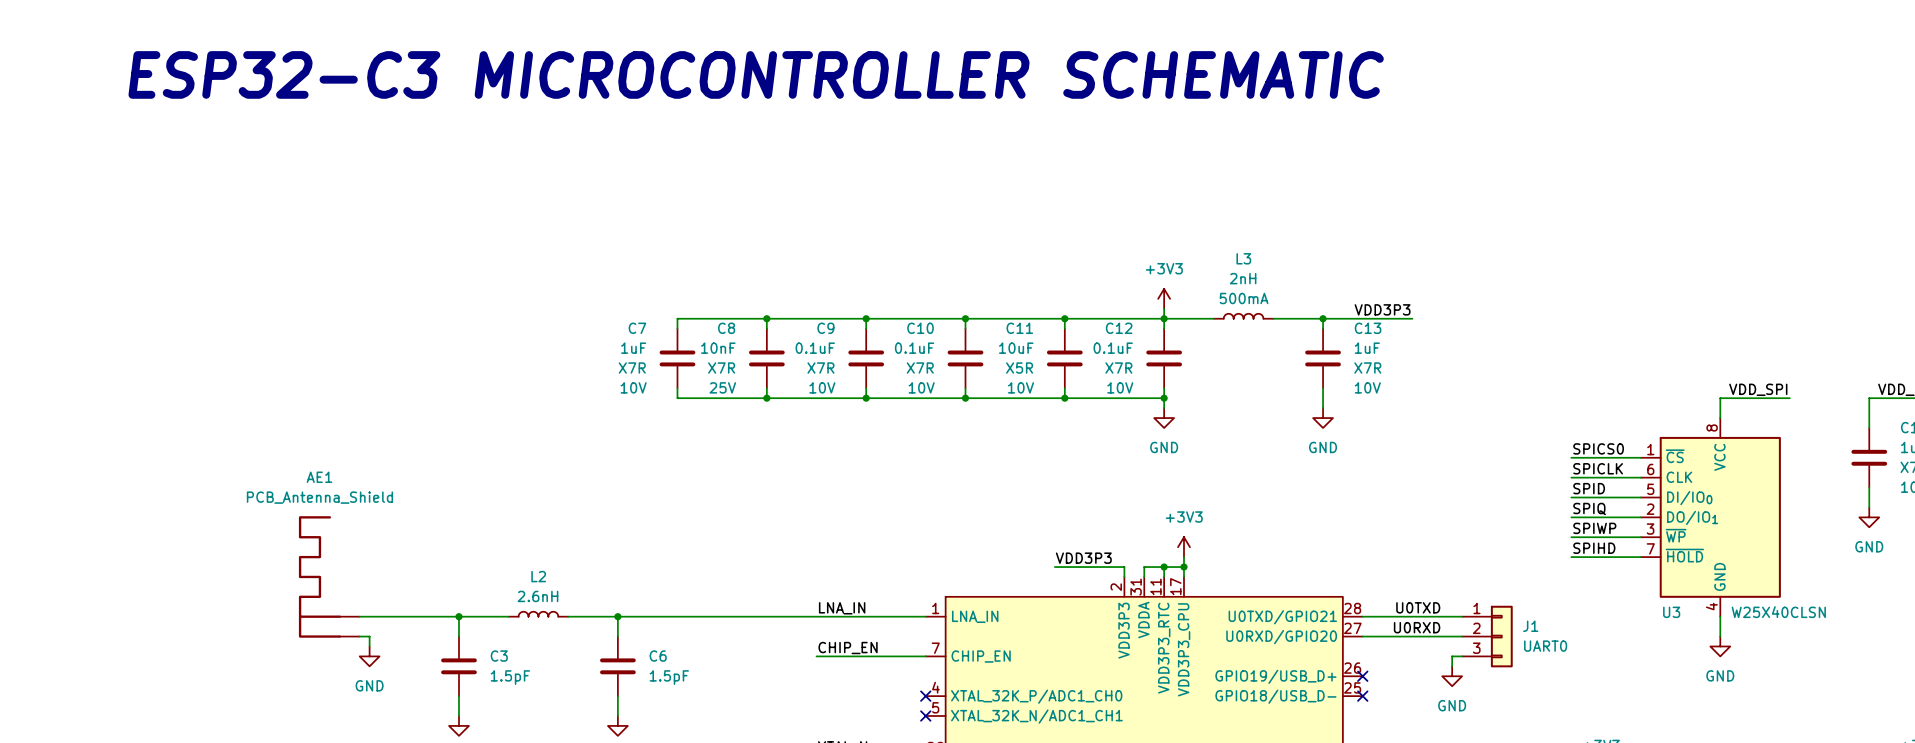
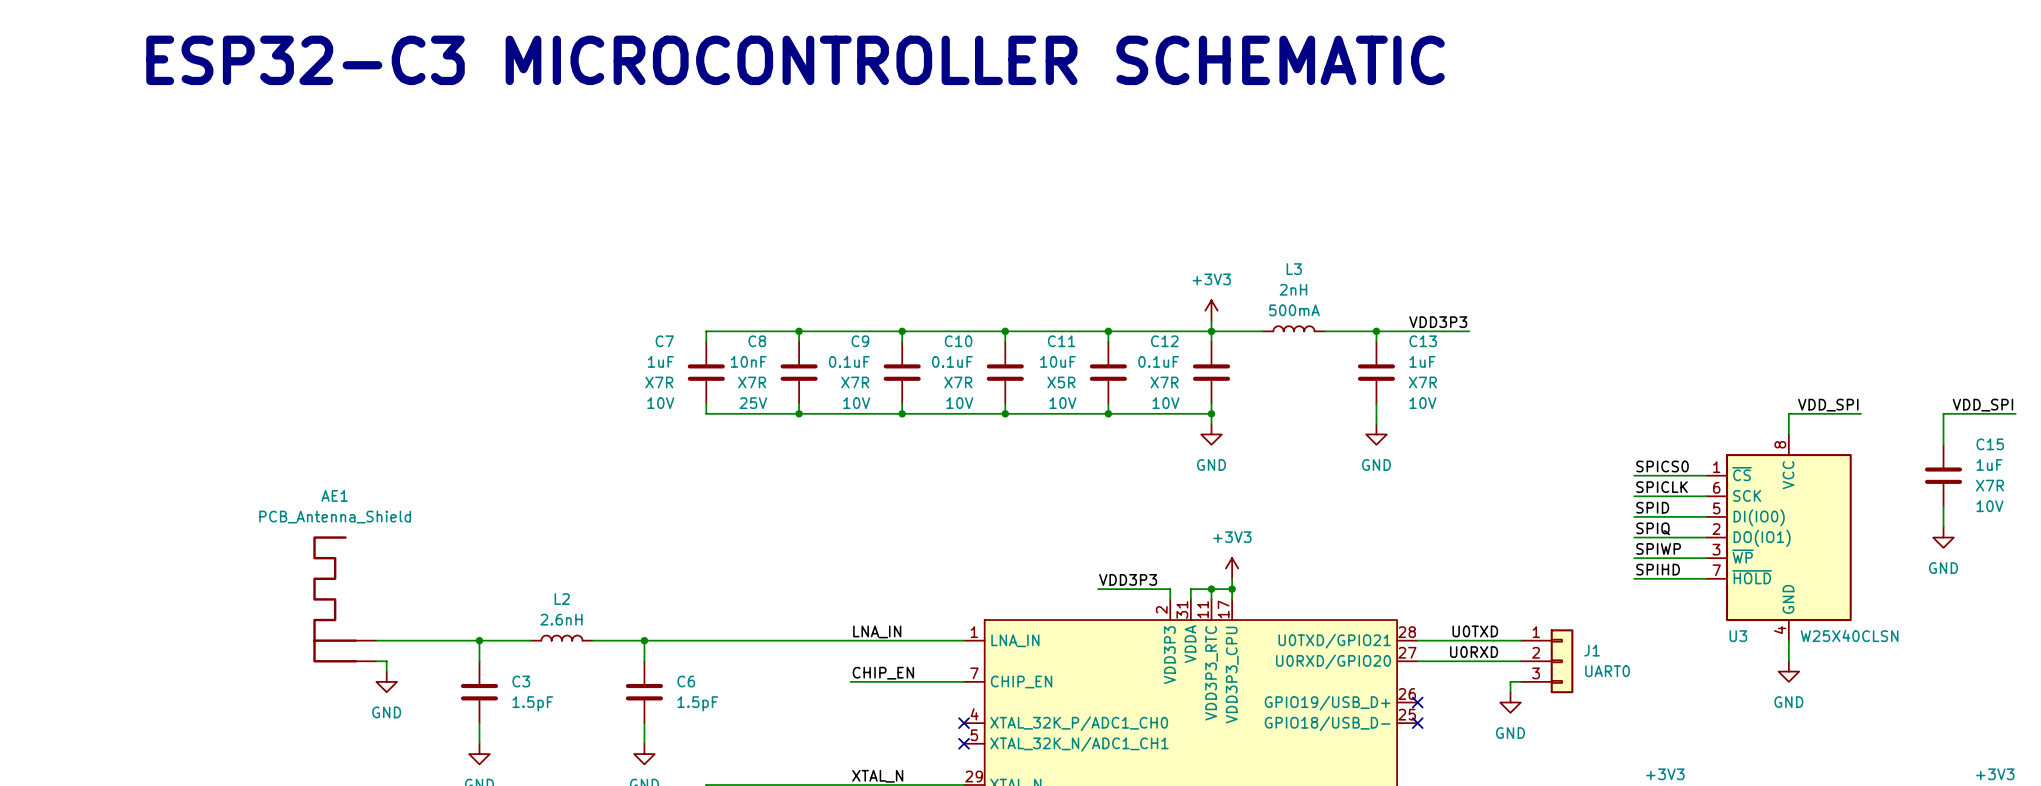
text: none -> ESP32-C3 MICROCONTROLLER SCHEMATIC (795, 60)
text: ESP32-C3 MICROCONTROLLER SCHEMATIC (756, 74) -> none
U3 pin name: CLK (1679, 477) -> SCK (1747, 495)
U3 pin name: DI/IO0 (1689, 498) -> DI(IO0) (1759, 517)
U3 pin name: DO/IO1 (1692, 517) -> DO(IO1) (1762, 538)

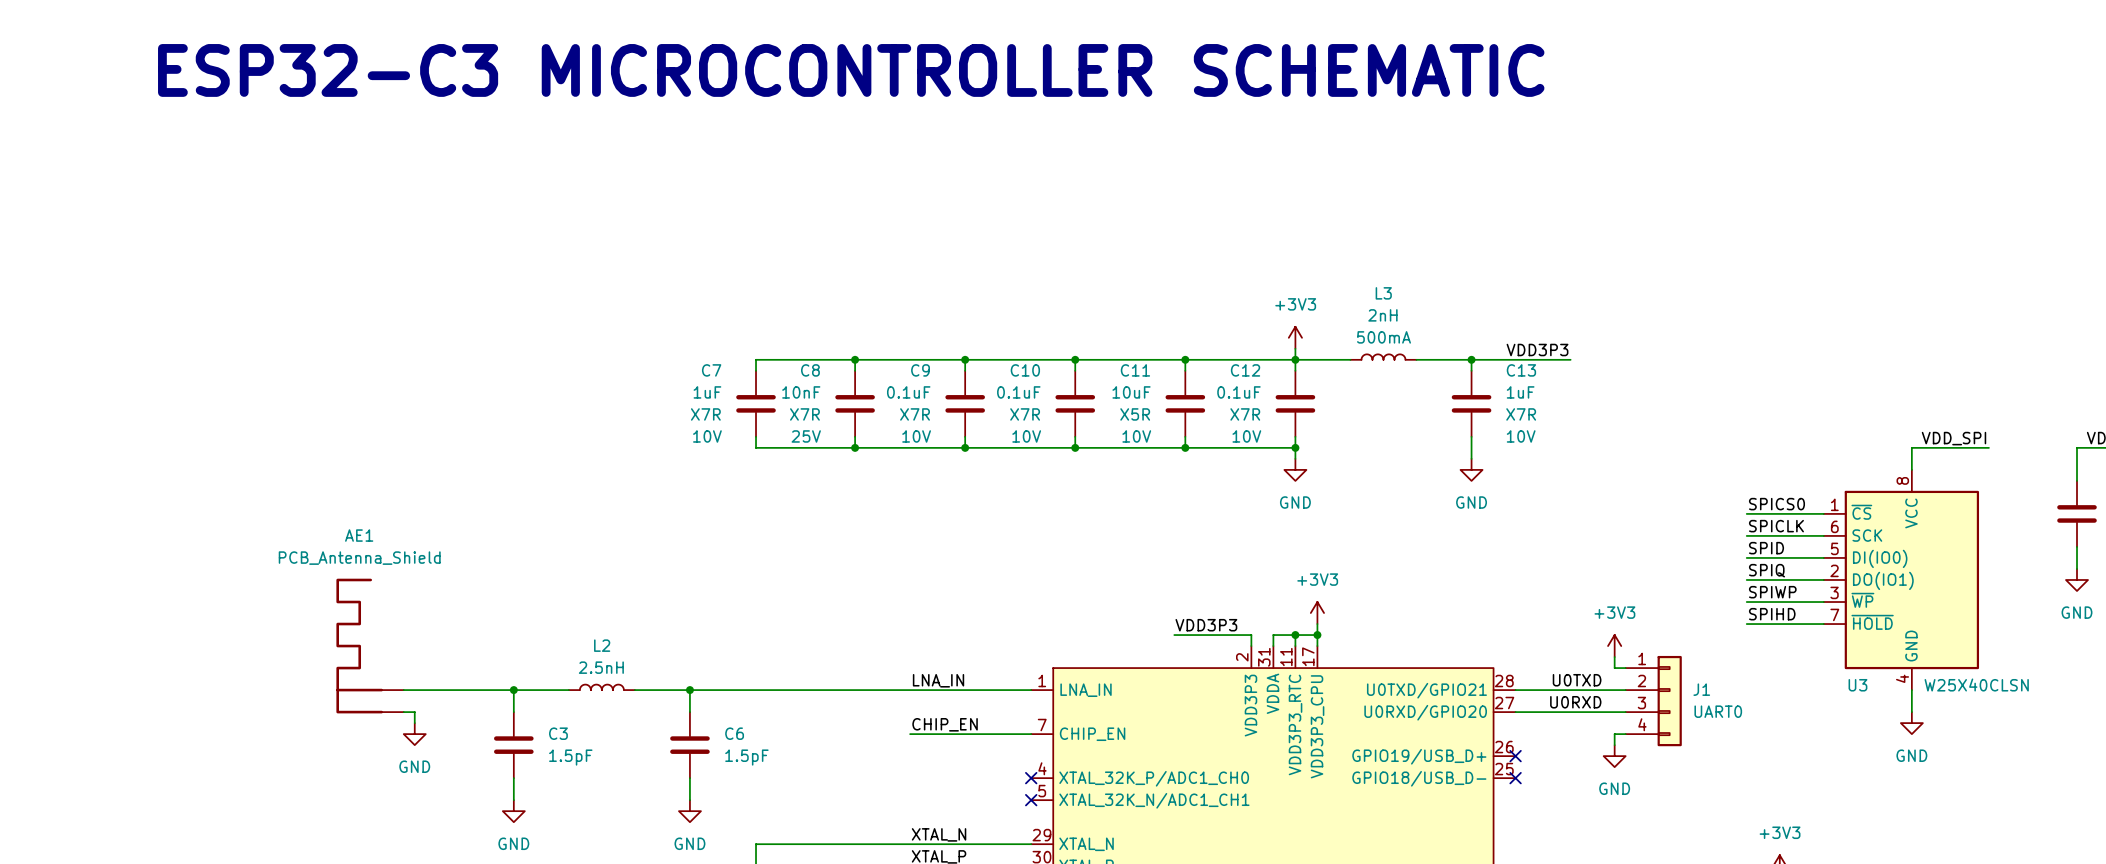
power symbol: none -> +3V3 (1614, 646)
wire: none -> (1614, 657) (1614, 668) (1625, 668)
L2 value: 2.6nH (561, 619) -> 2.5nH (601, 667)
J1 symbol: [1520, 629, 1574, 694] -> [1625, 655, 1682, 747]

